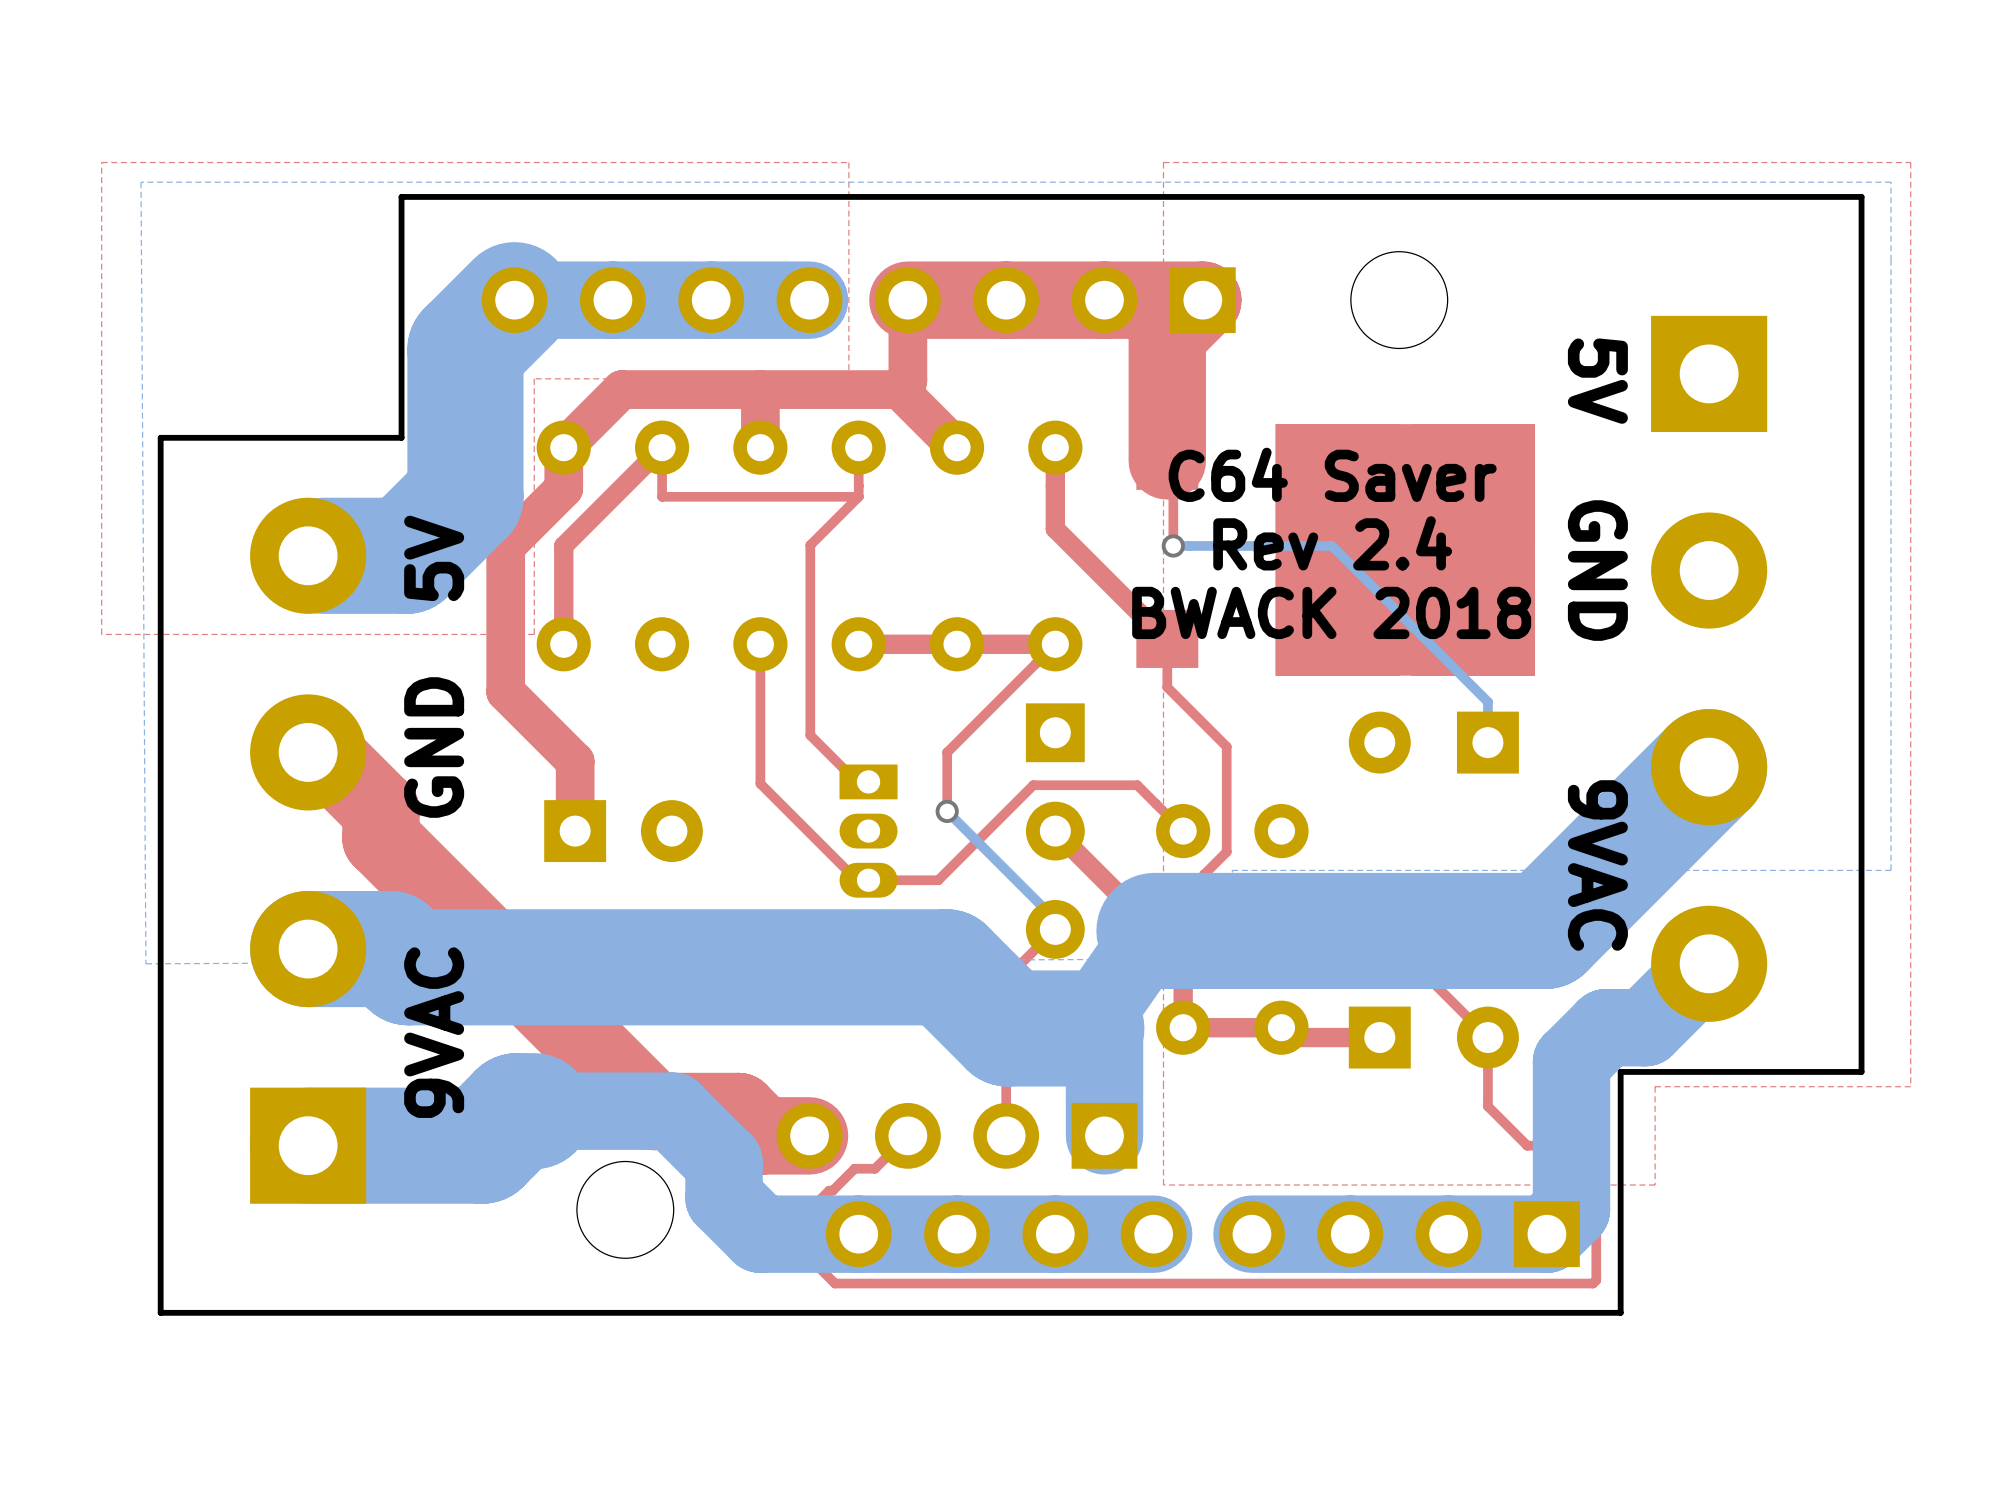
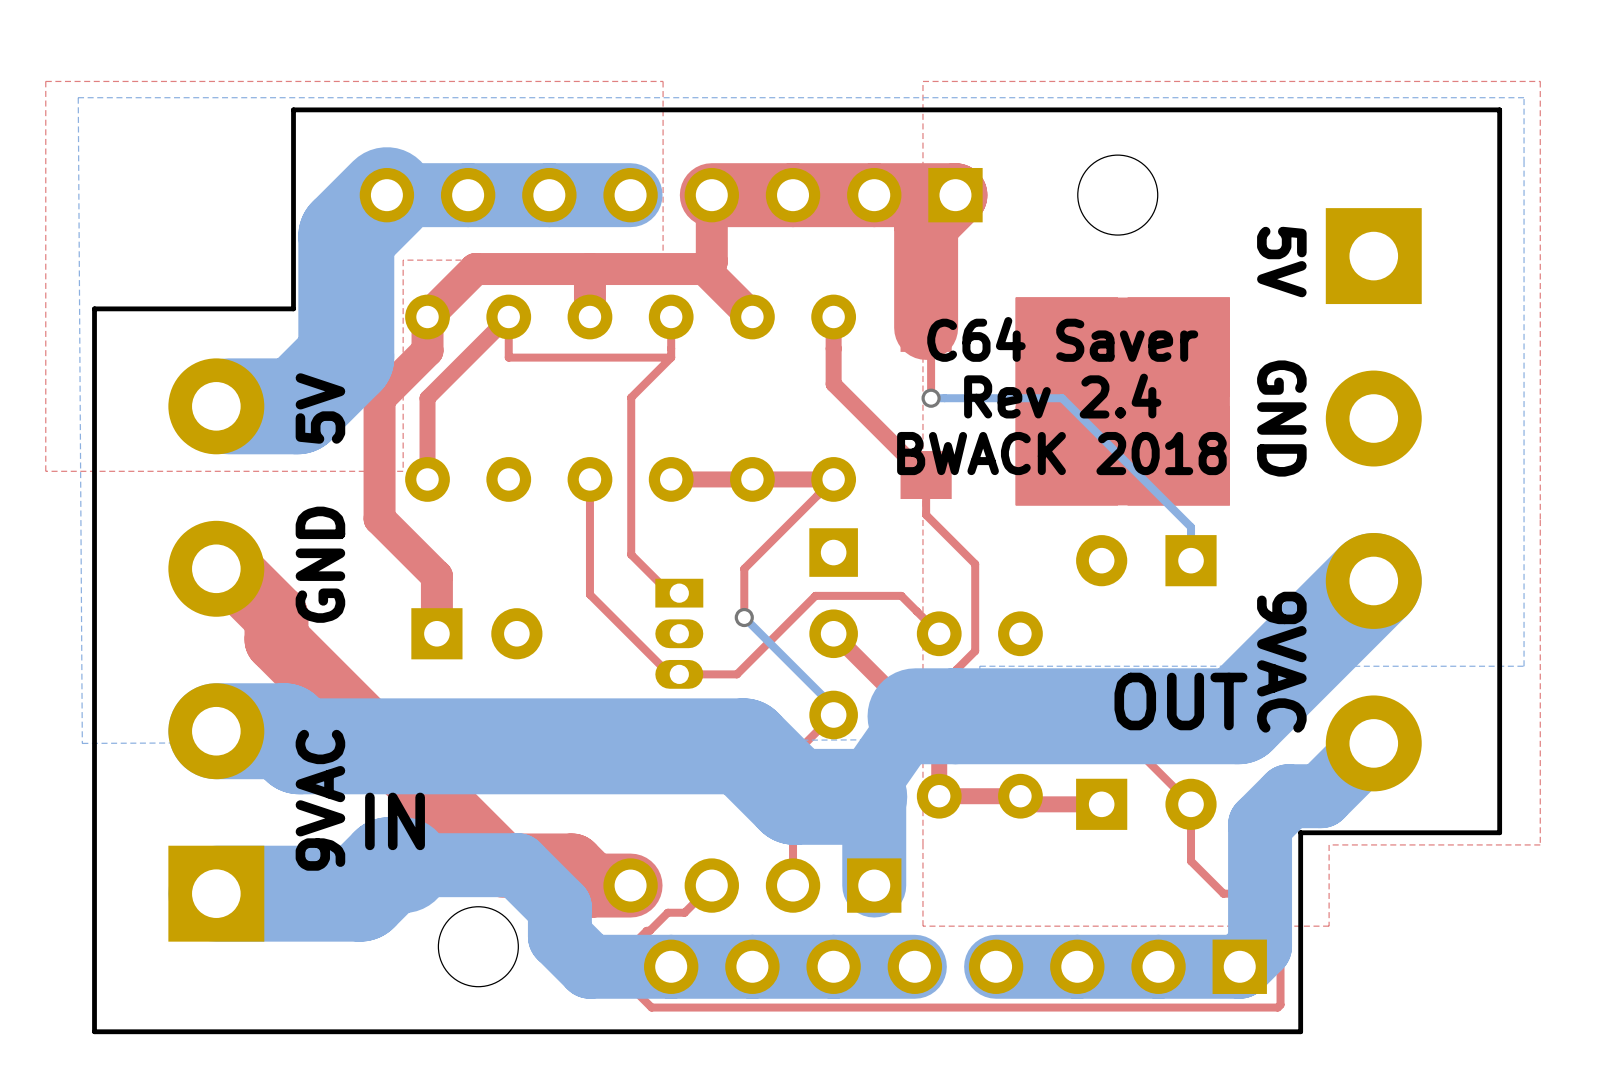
text: none -> OUT (1180, 701)
text: none -> IN (395, 821)

